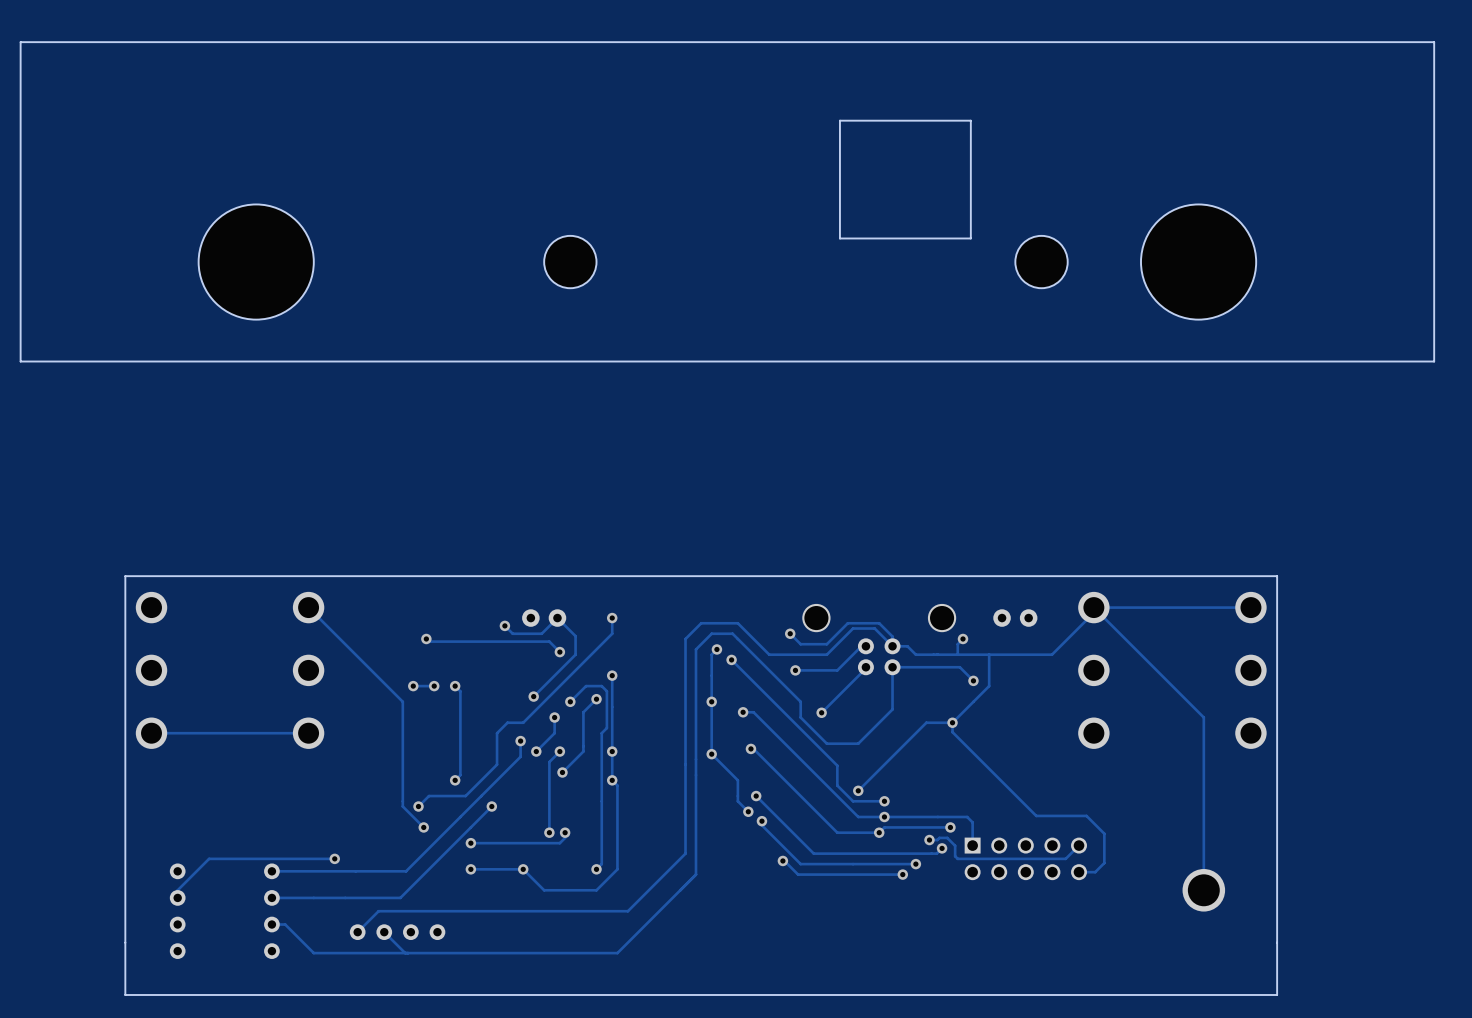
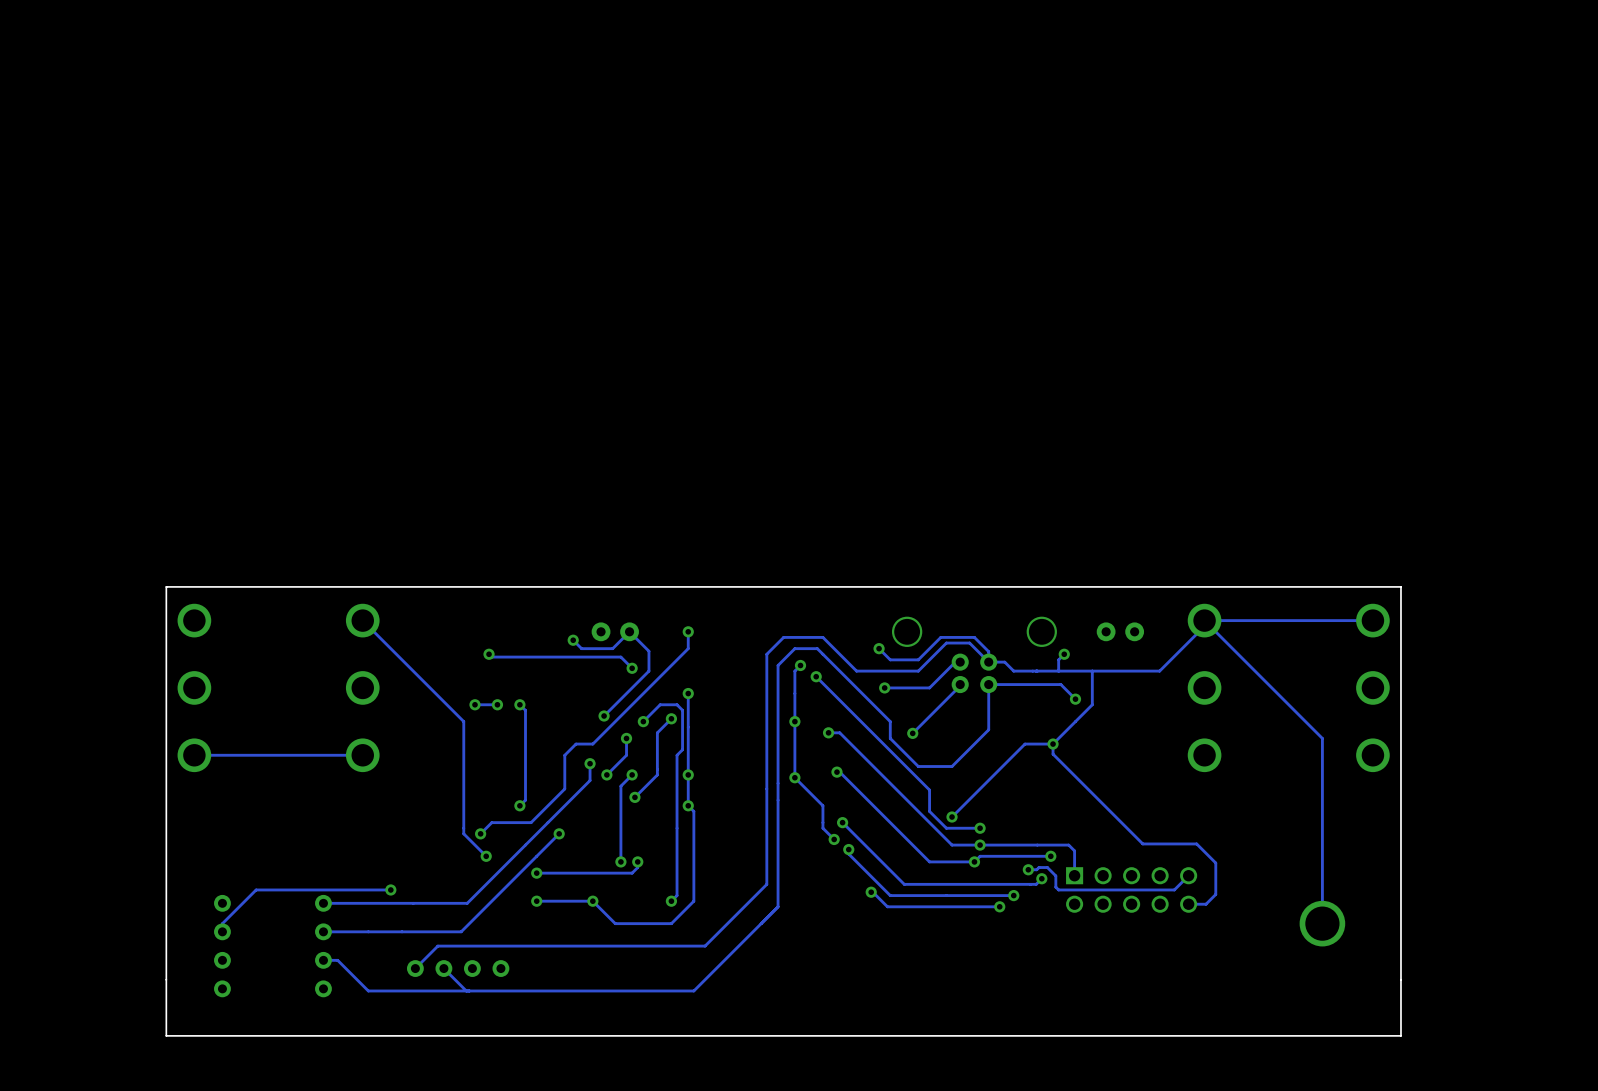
board edge: (1434, 42) (20, 42) (20, 361) (1434, 361) (1434, 42) -> none
board edge: (970, 120) (970, 238) (839, 238) (839, 120) (970, 120) -> none
part: (256, 262) -> none
part: (570, 262) -> none
part: (1041, 262) -> none
part: (1198, 262) -> none

